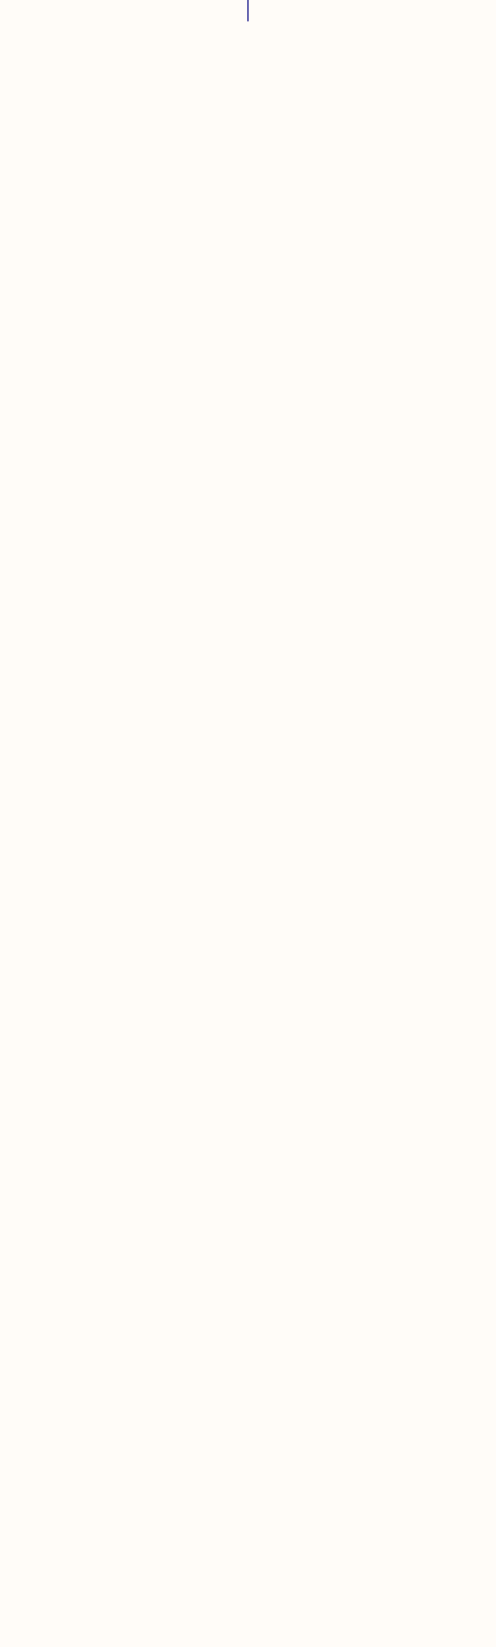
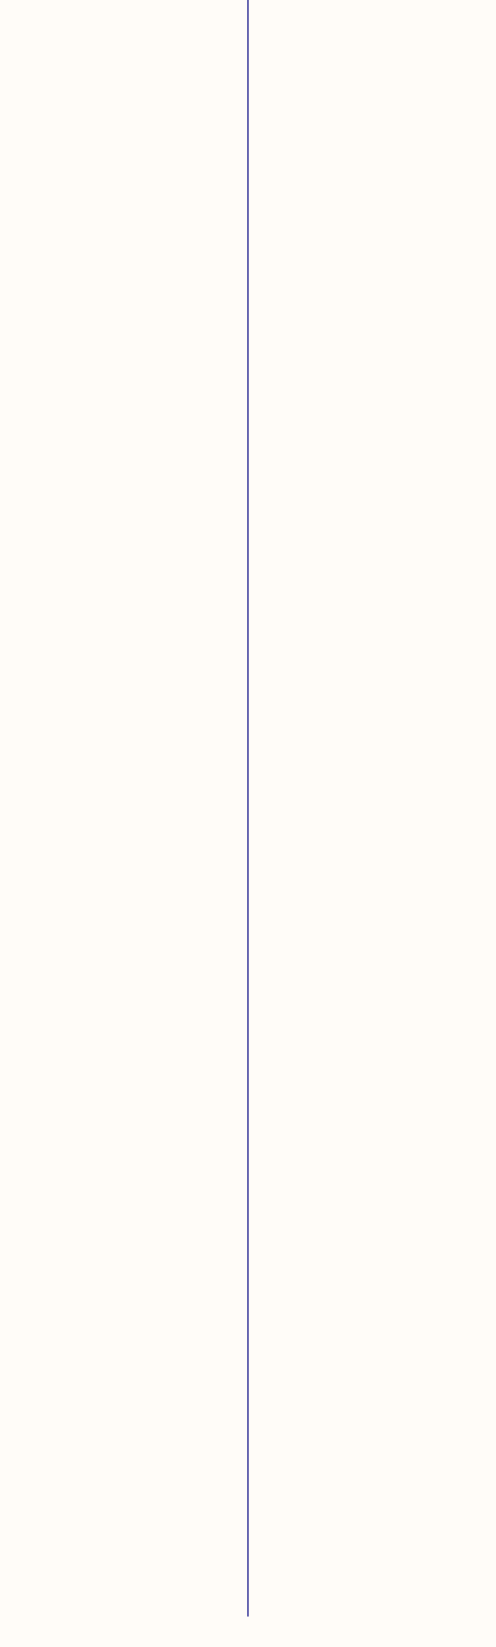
bus: none -> (247, 21) (247, 1616)

